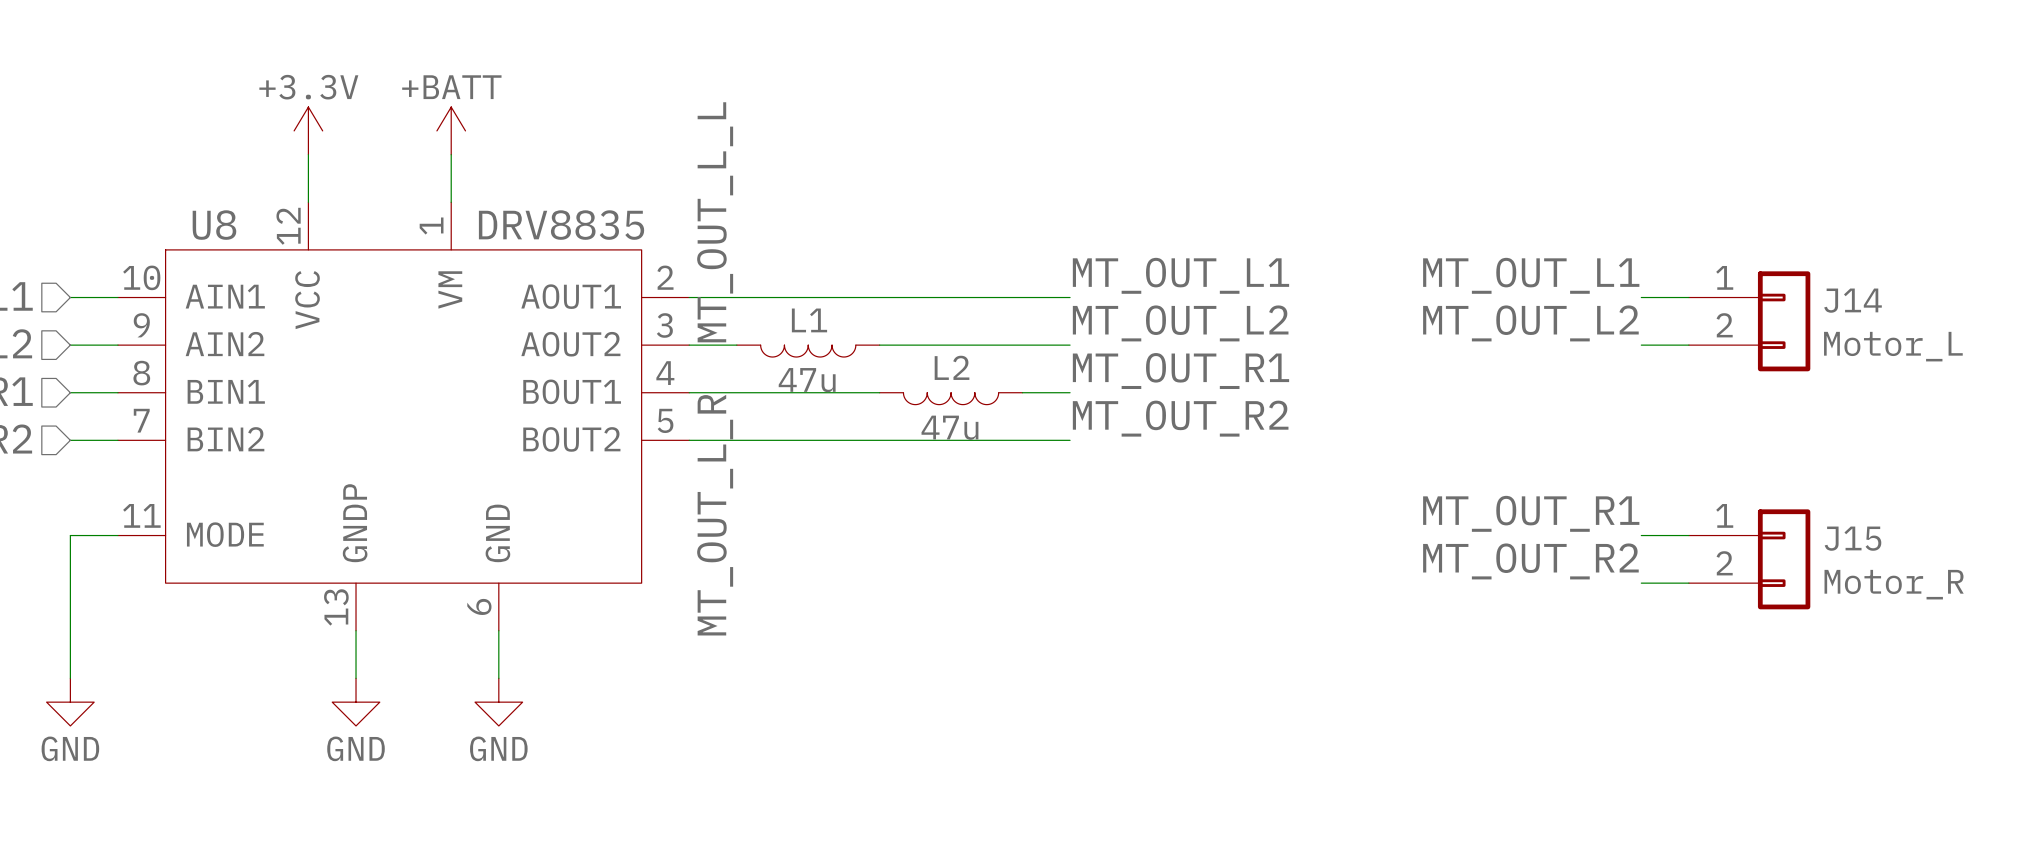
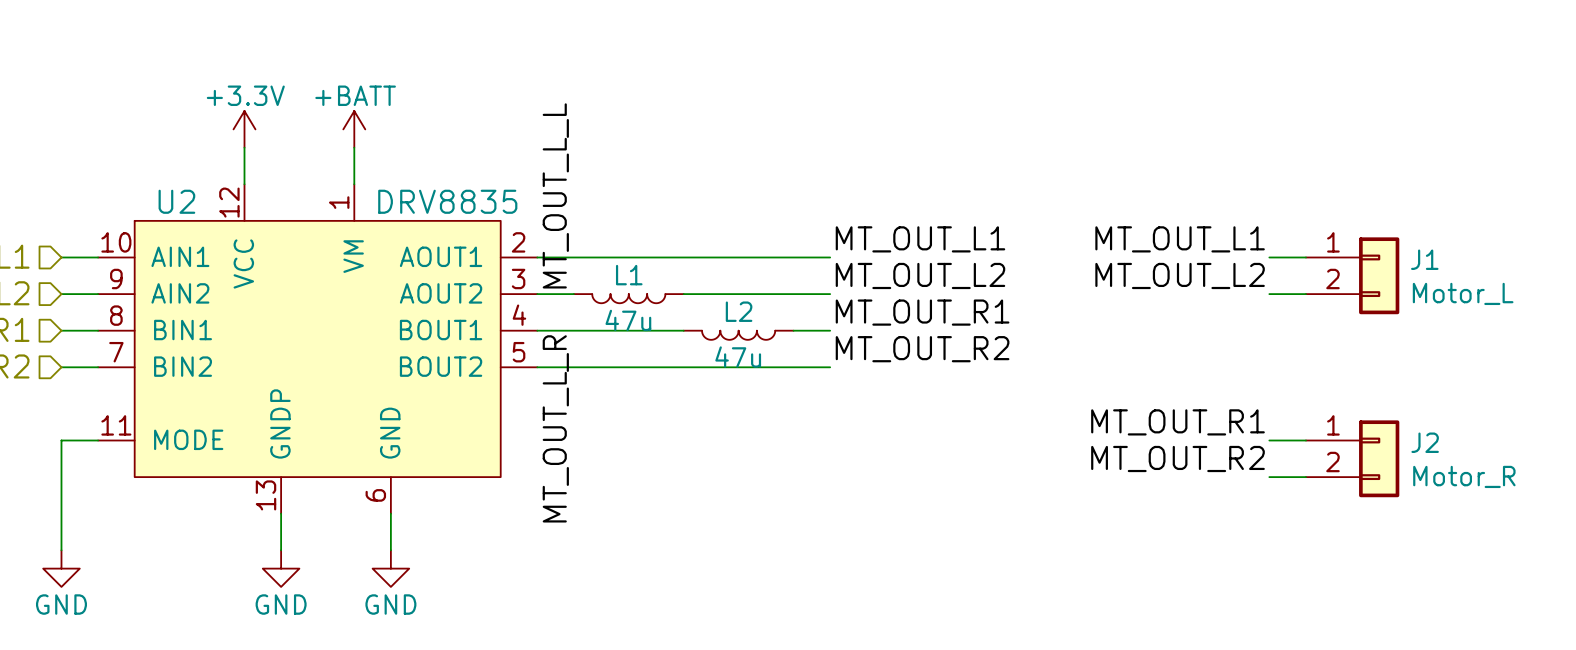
U8 name: U8 (214, 225) -> U2 (176, 201)
J14 name: J14 (1853, 300) -> J1 (1424, 259)
J15 name: J15 (1853, 538) -> J2 (1425, 442)

